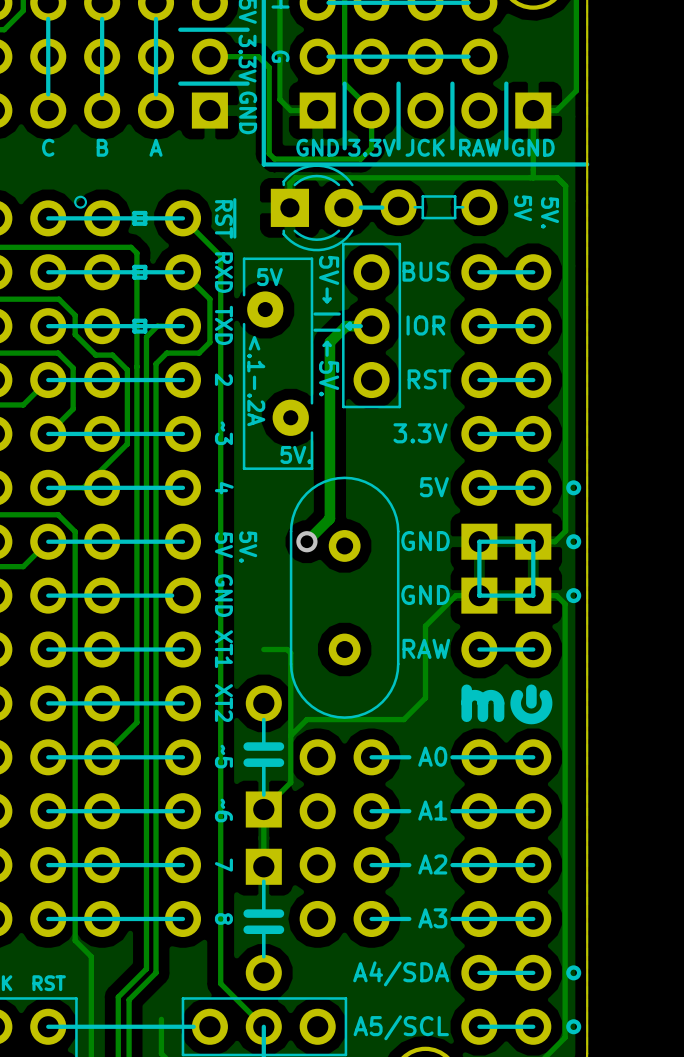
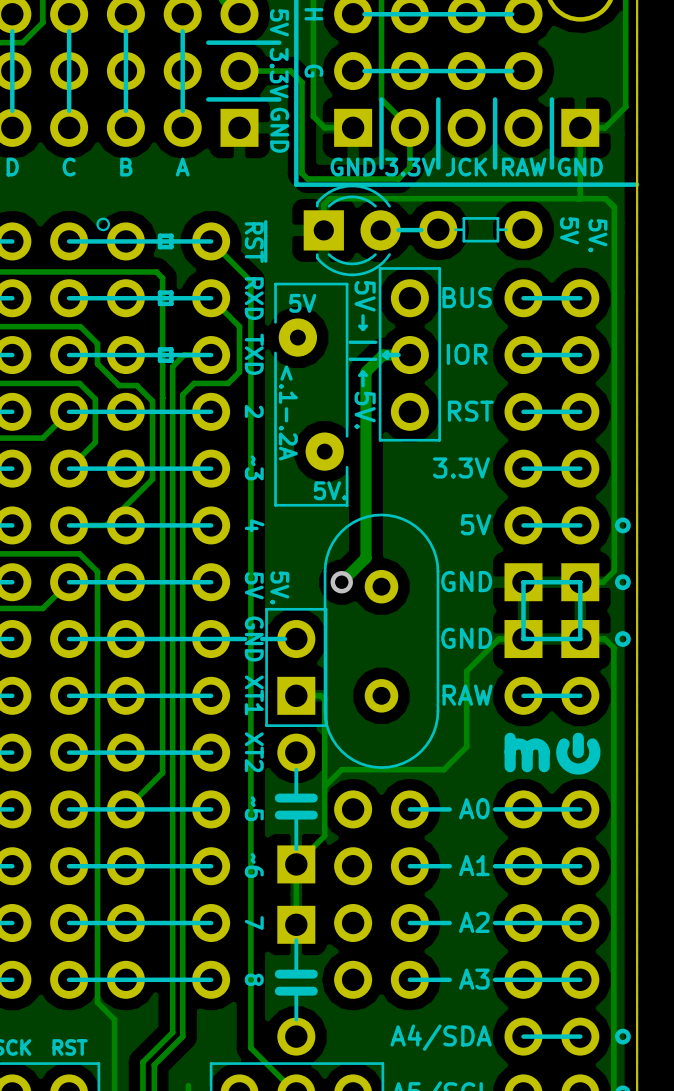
line: none -> (245, 639) (199, 639)
line: none -> (284, 639) (262, 639)
part: none -> (296, 667)

